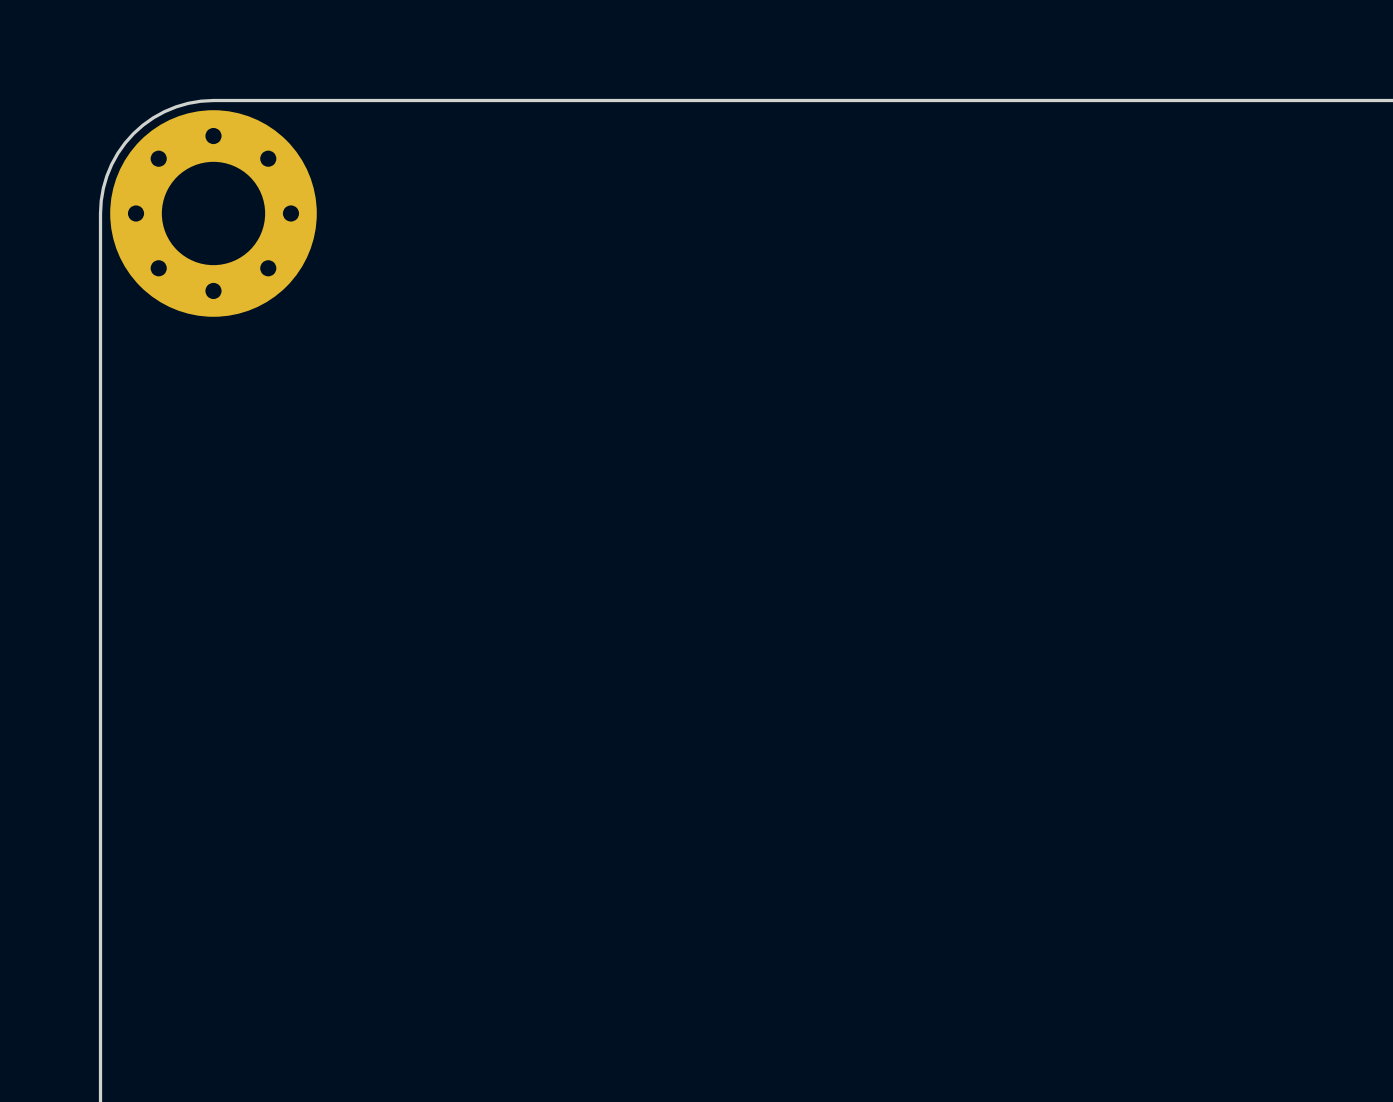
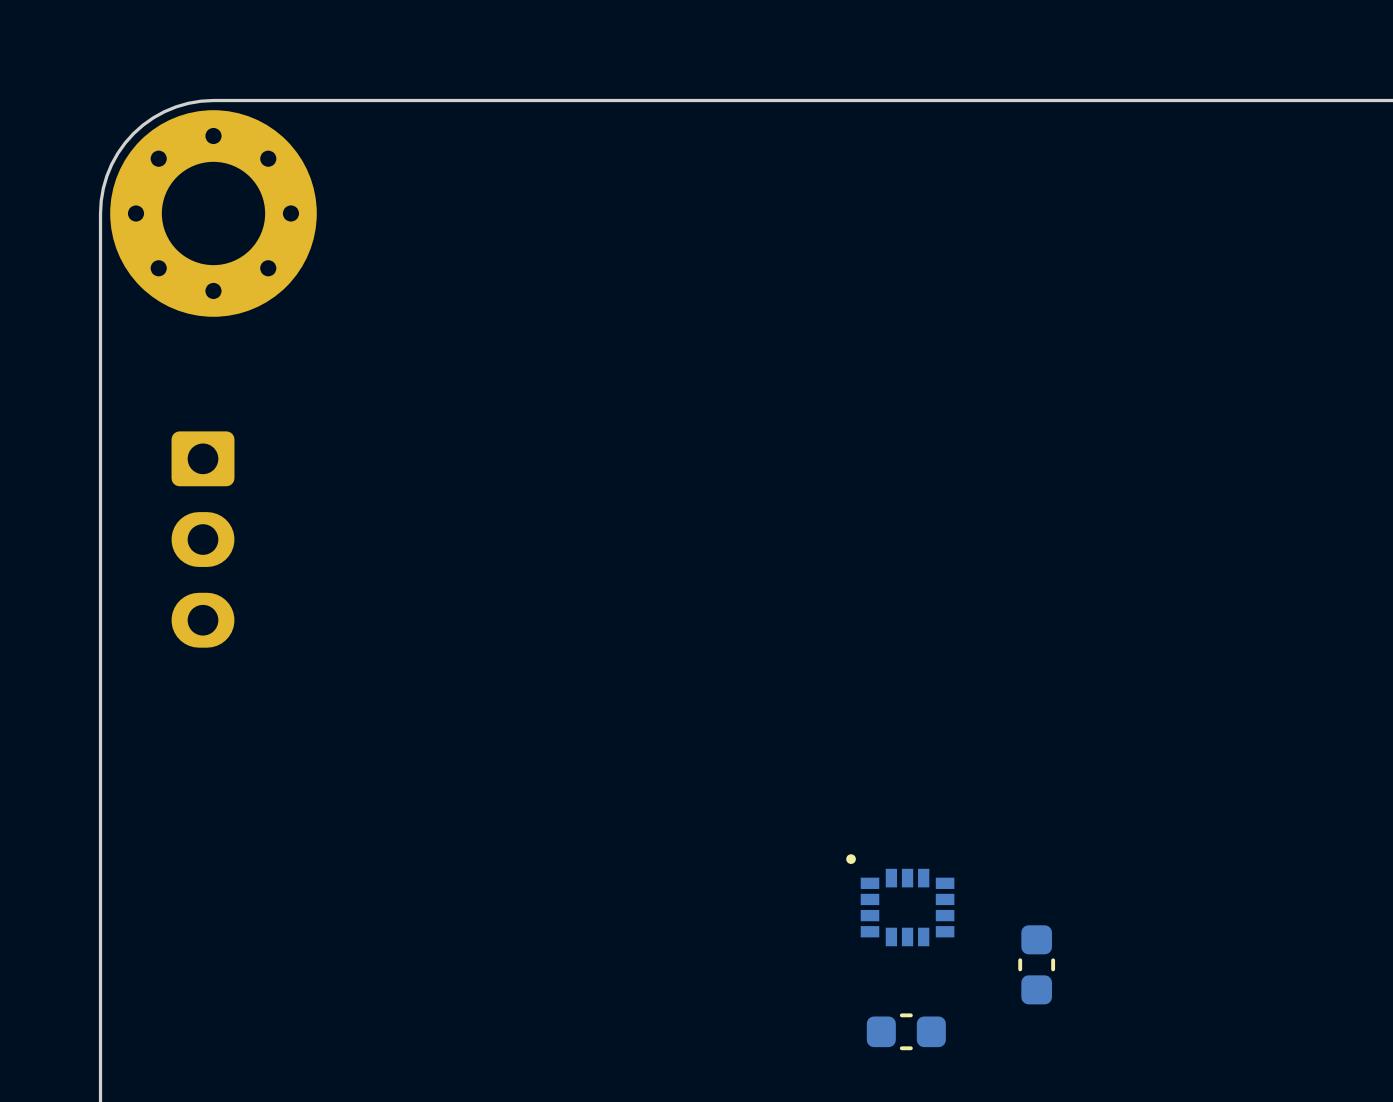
part: none -> (203, 539)
part: none -> (900, 900)
part: none -> (1036, 964)
part: none -> (906, 1031)

